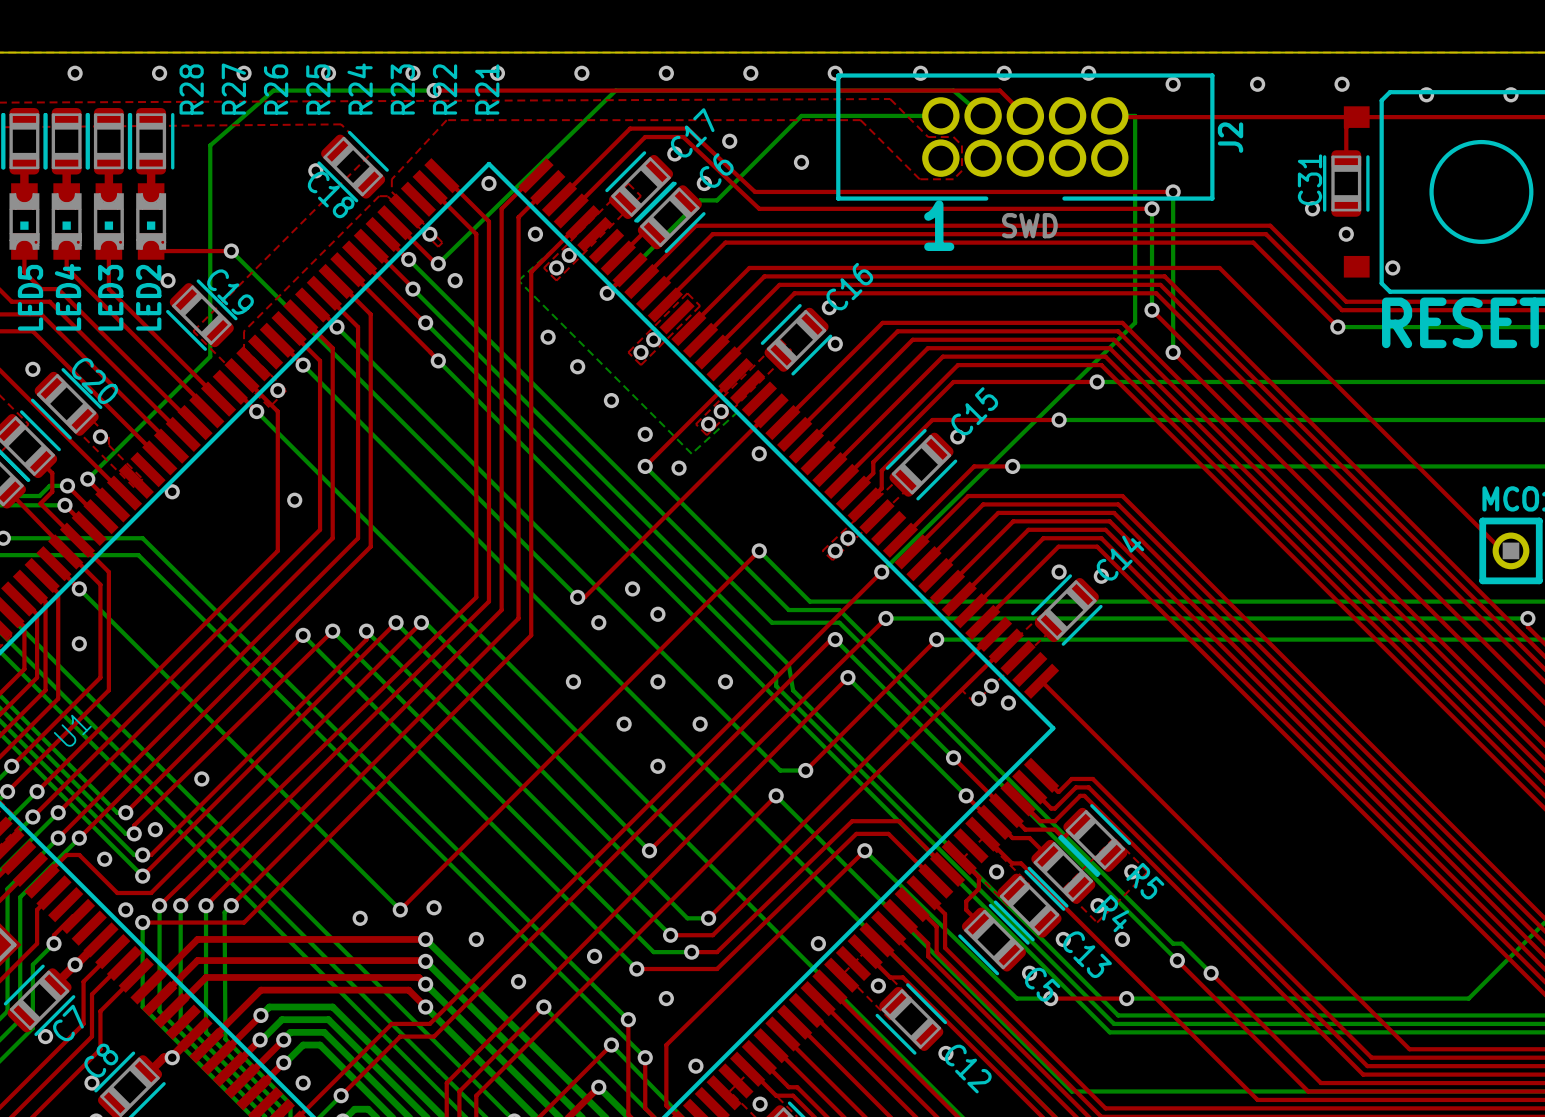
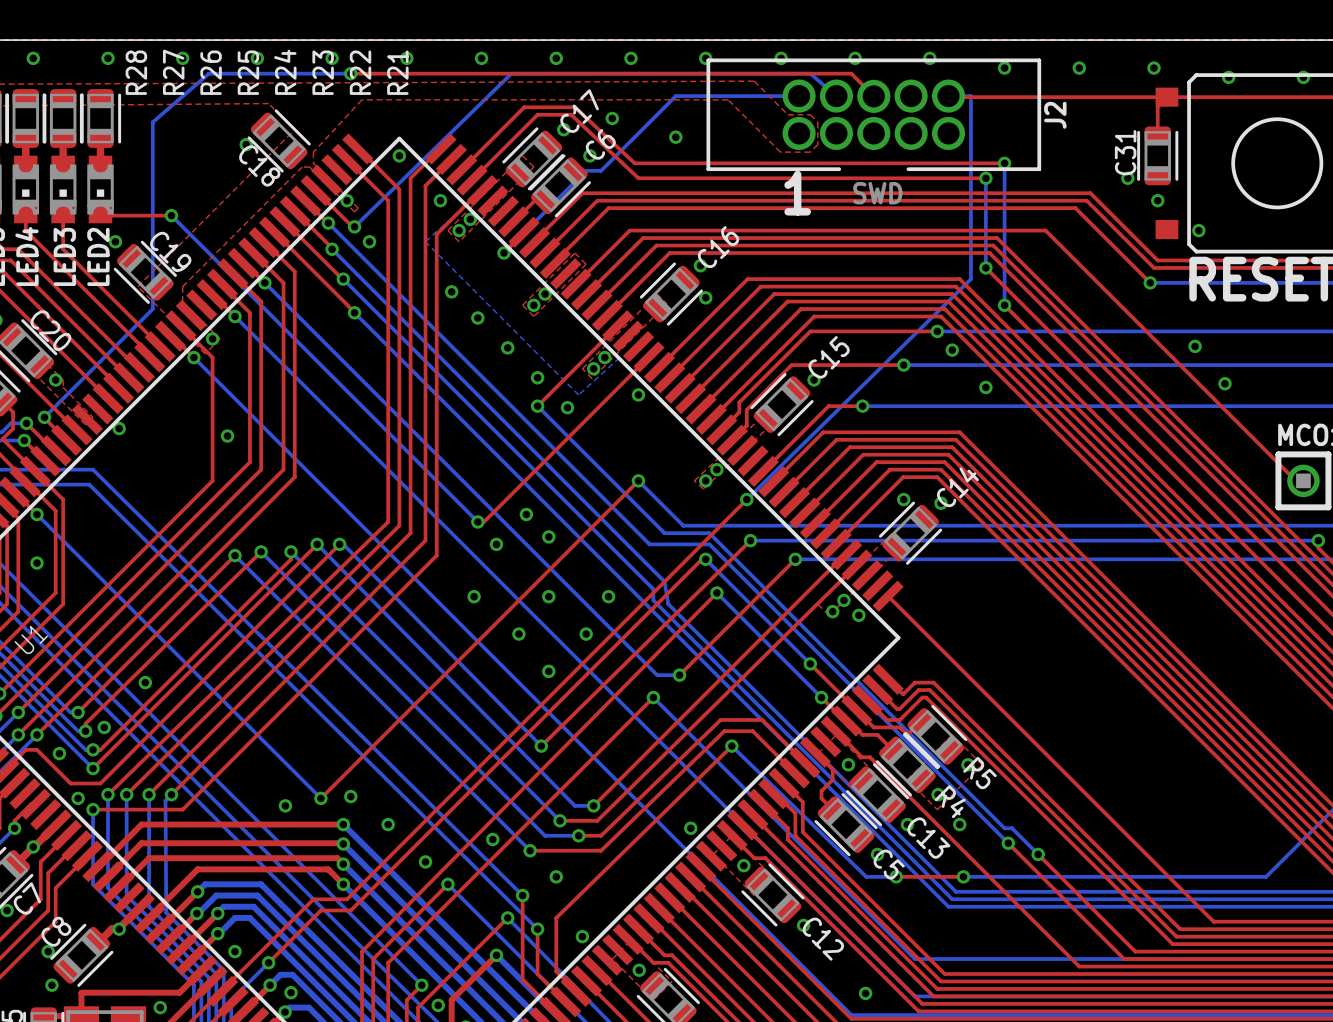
via: none -> (1195, 346)
via: none -> (952, 350)
via: none -> (1224, 383)
via: none -> (985, 387)

